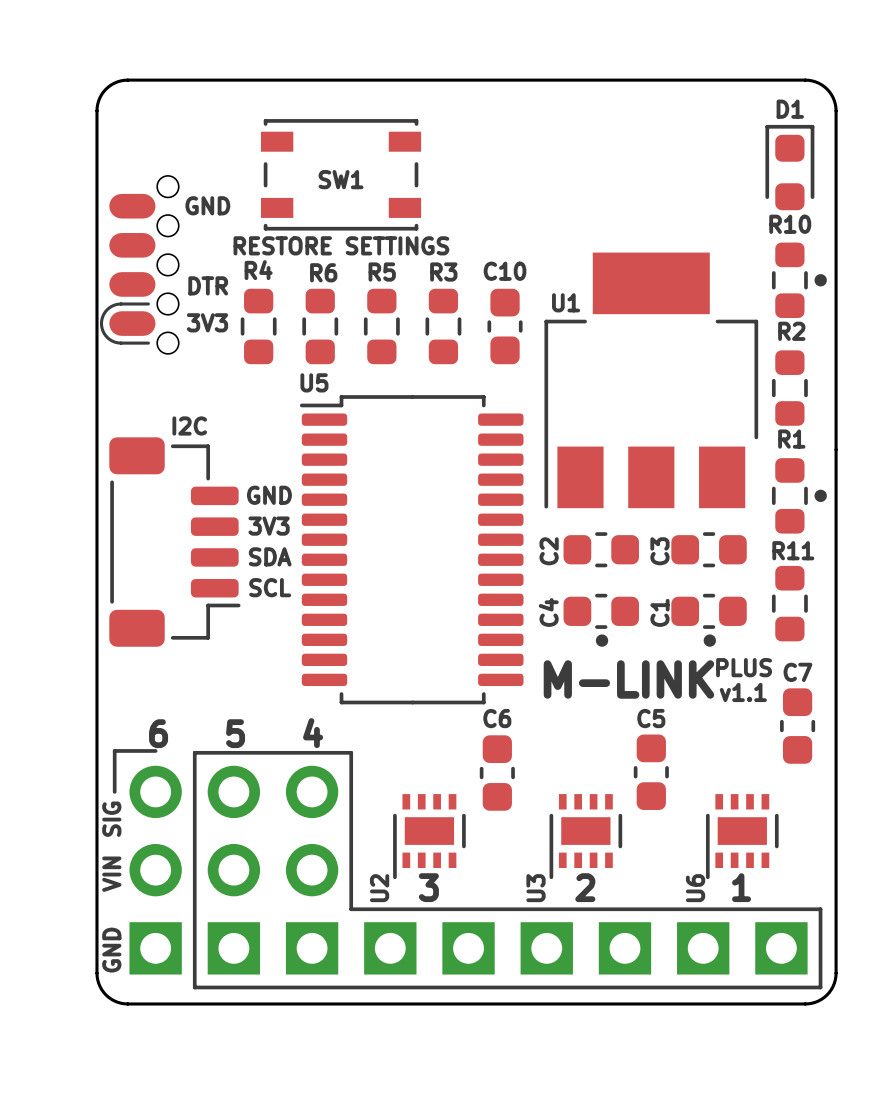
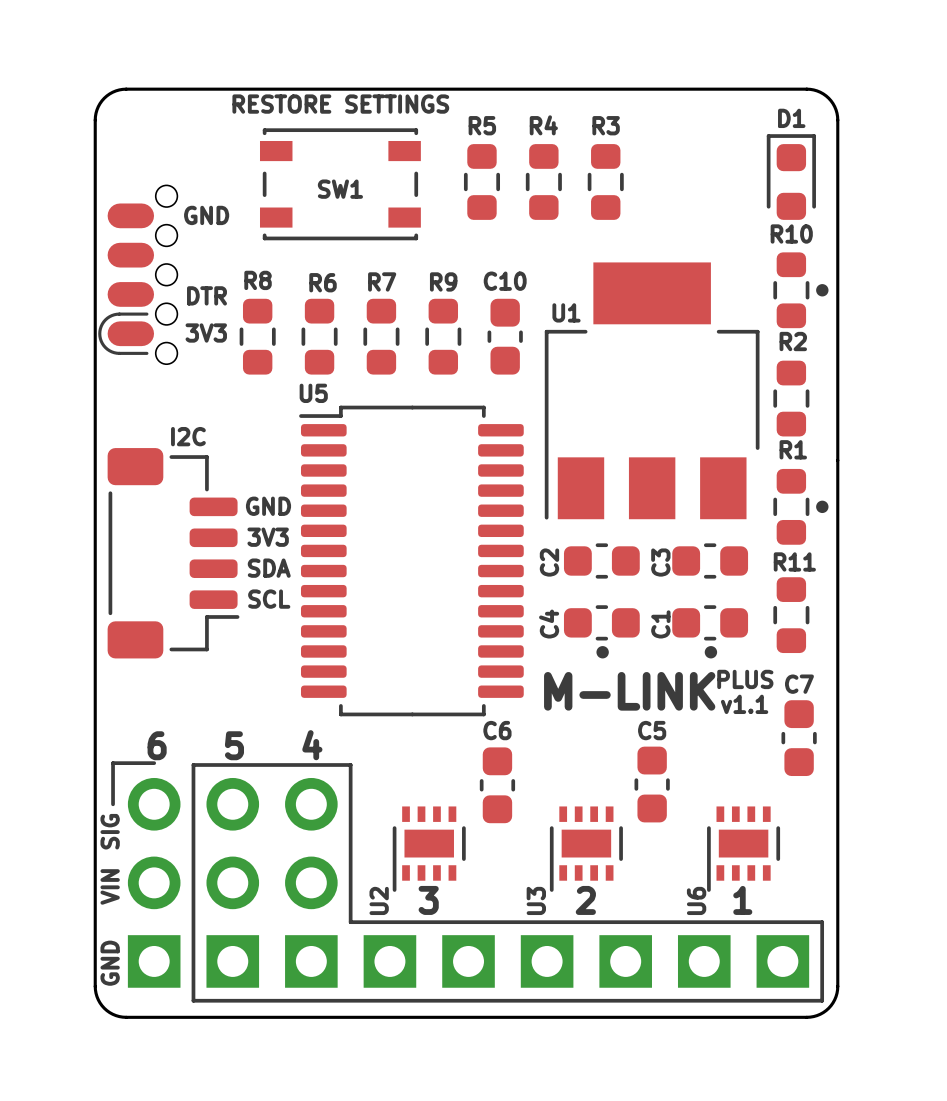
R5: none -> (481, 181)
R4: none -> (543, 181)
R3: none -> (605, 181)
SW1 value position: RESTORE SETTINGS (341, 245) -> RESTORE SETTINGS (340, 104)
R4 name: R4 (258, 270) -> R8 (258, 280)
R5 name: R5 (382, 272) -> R7 (382, 281)
R3 name: R3 (443, 272) -> R9 (443, 281)

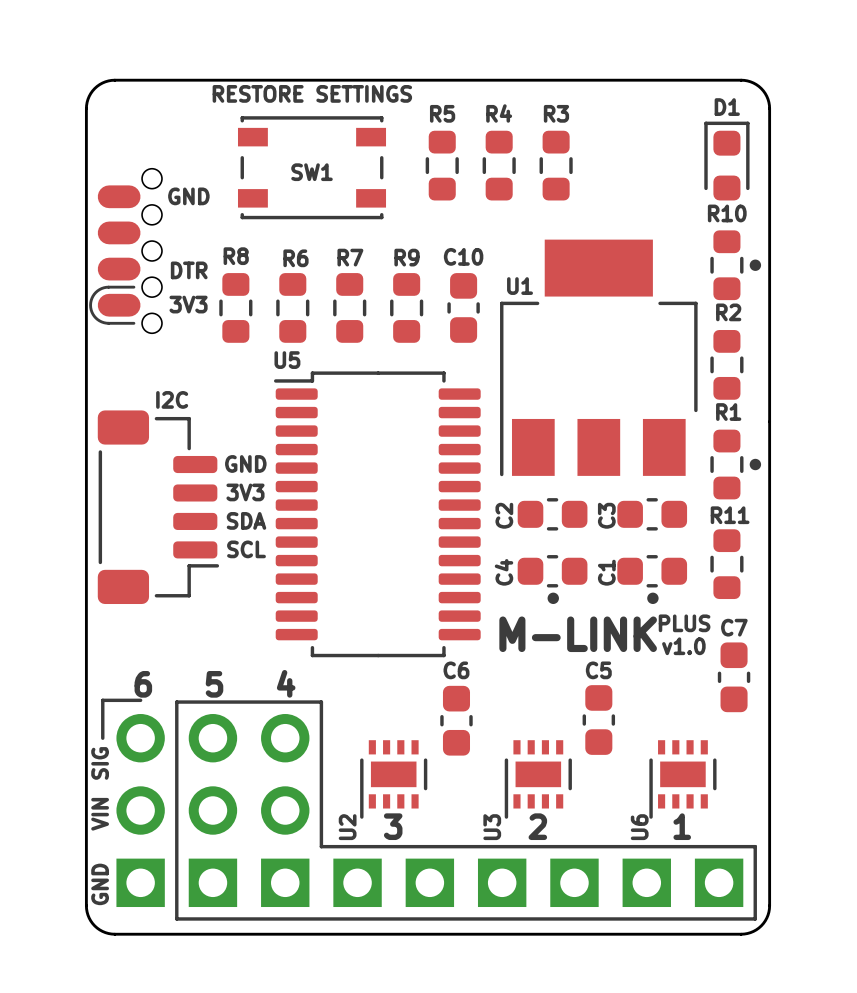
text: v1.1 (744, 704) -> v1.0 (683, 646)

